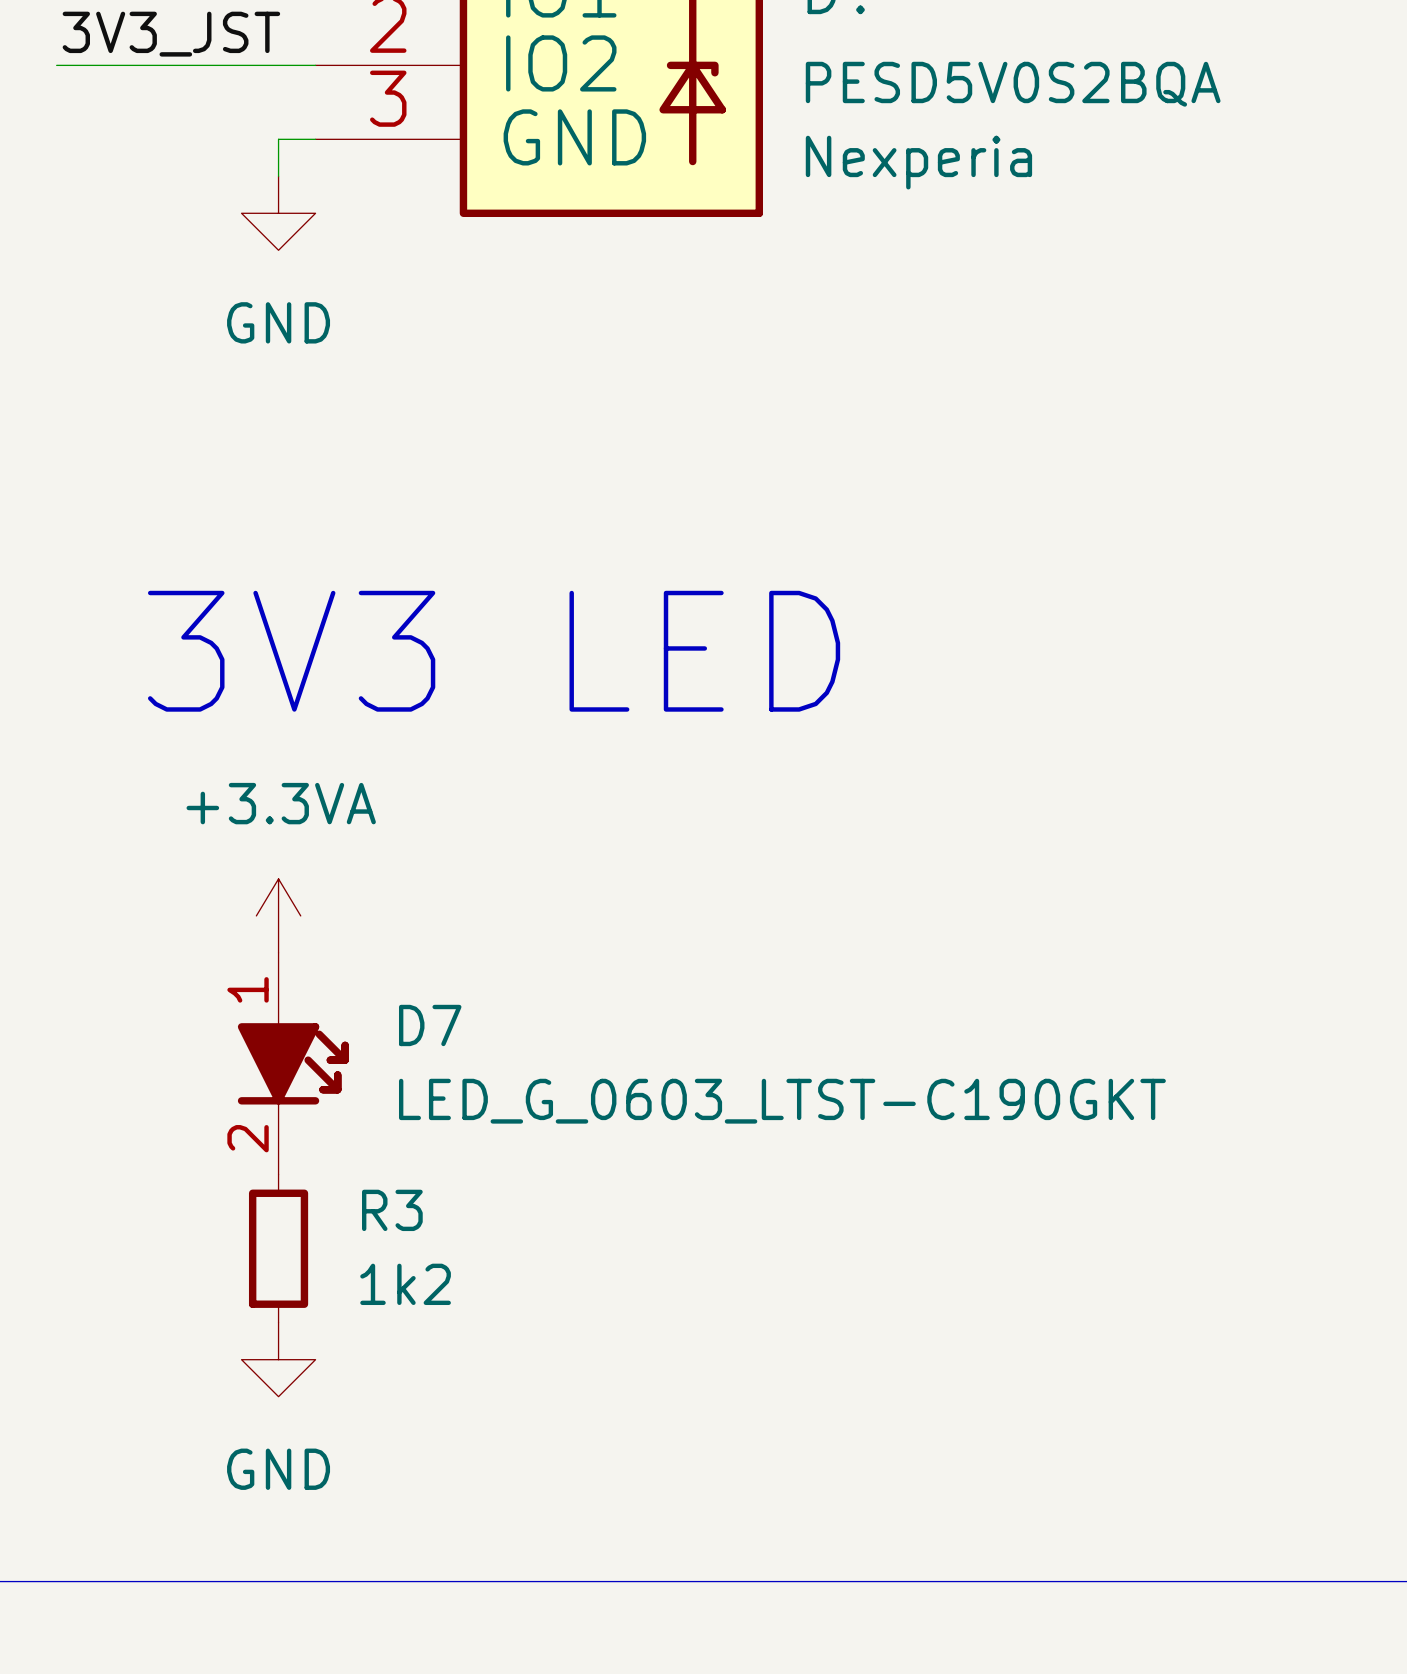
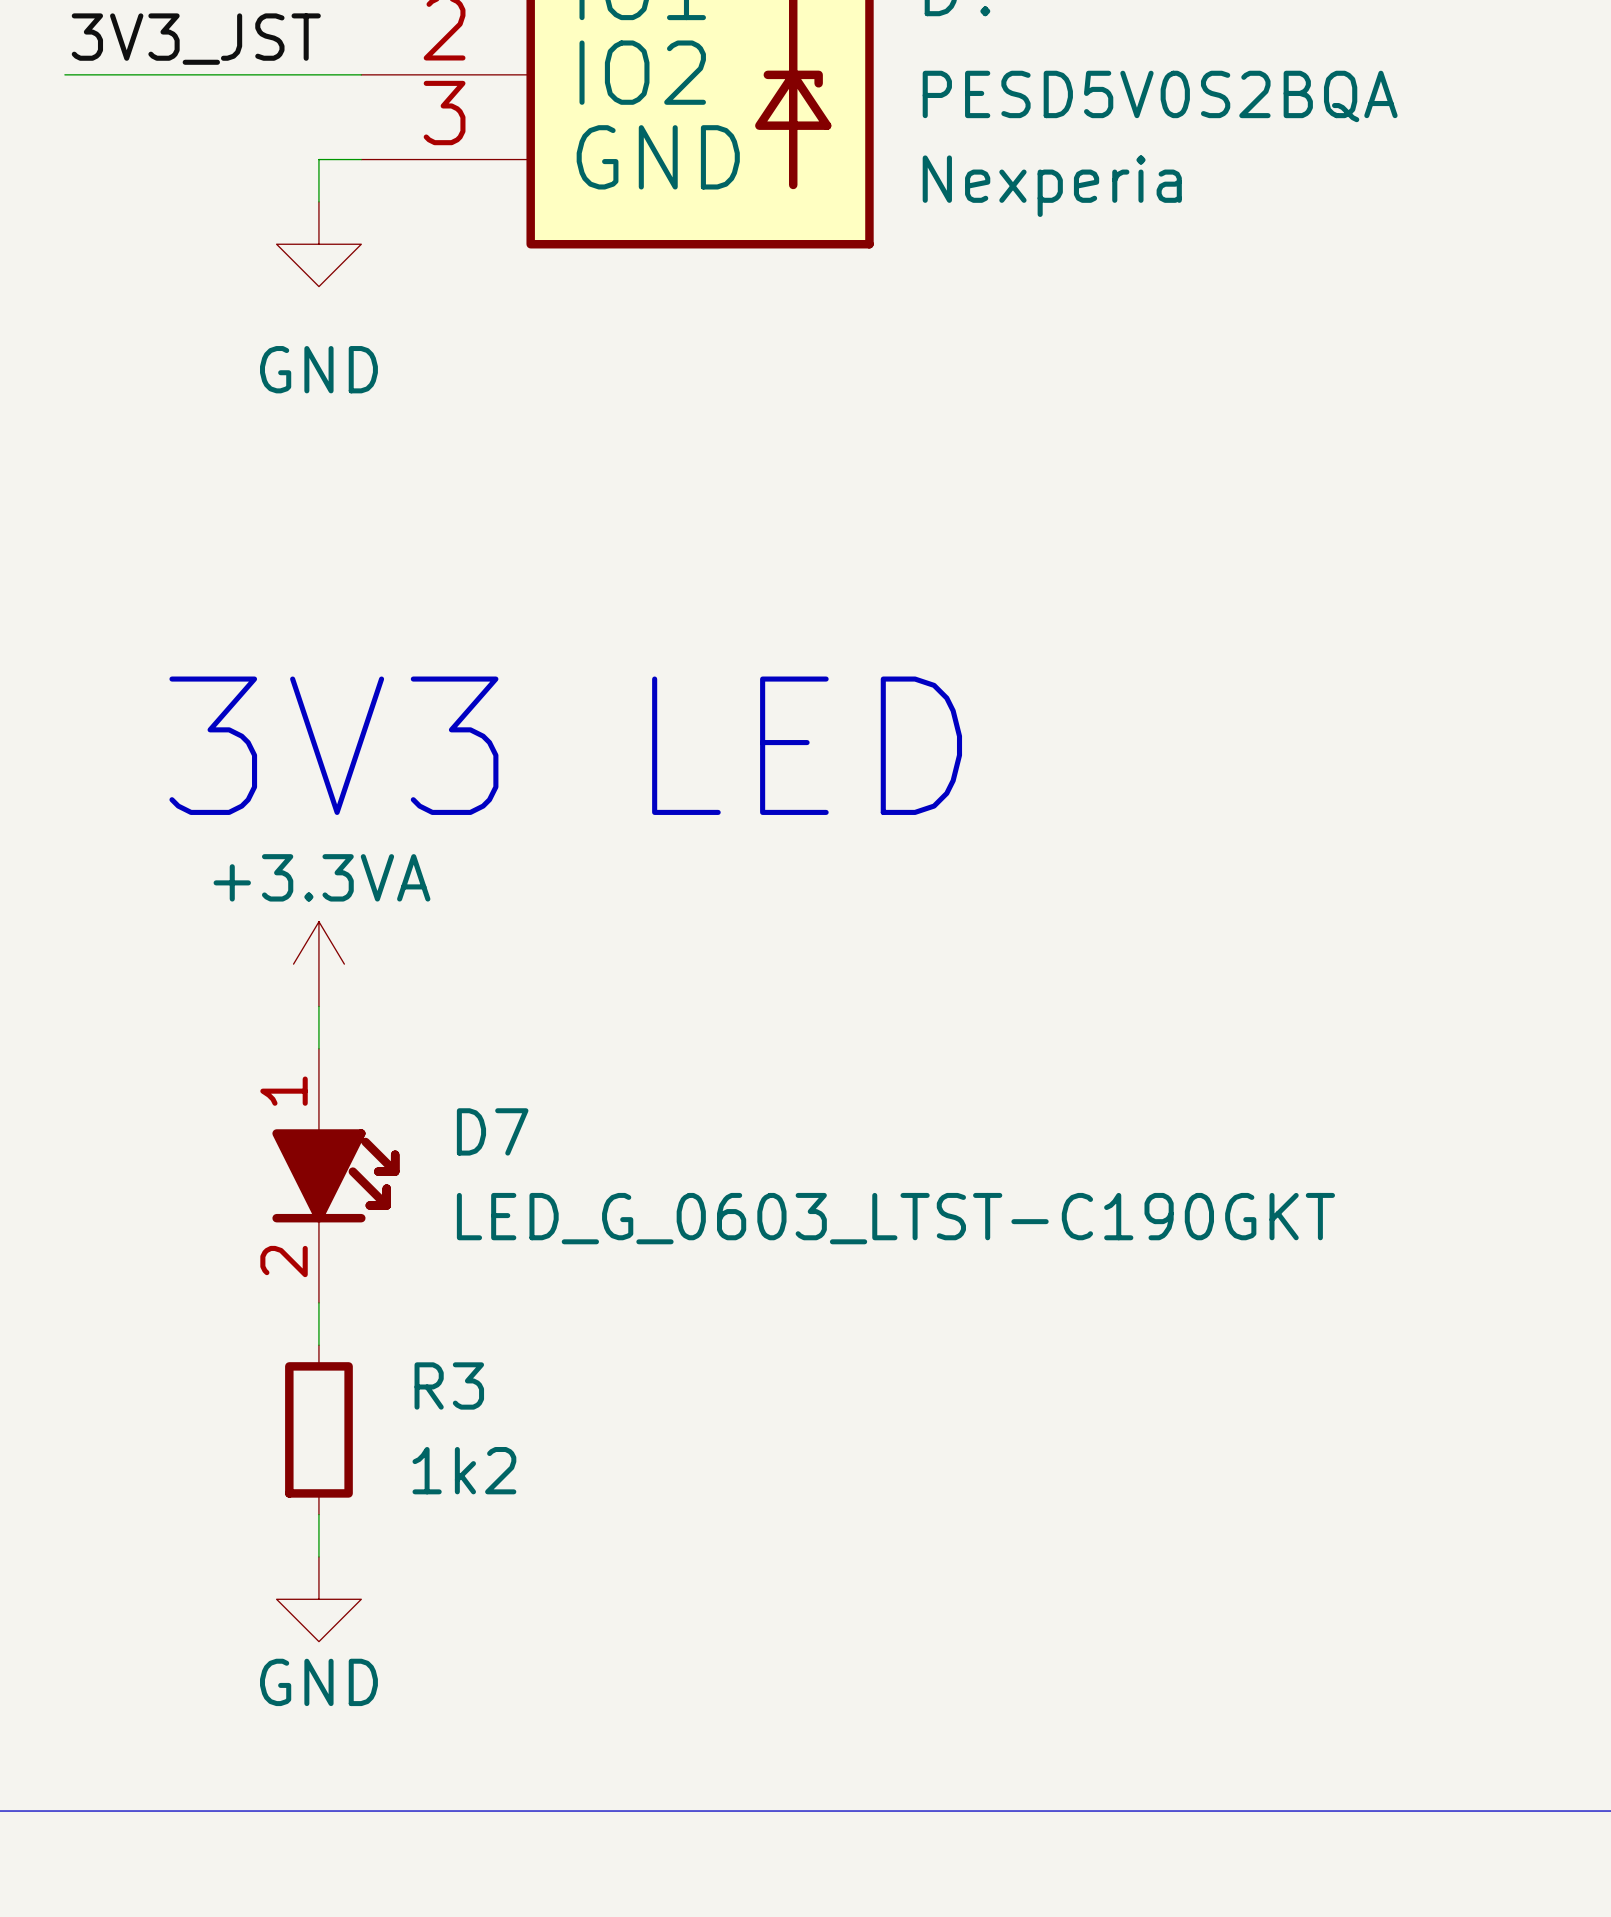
power symbol text position: +3.3VA (281, 803) -> +3.3VA (321, 877)
power symbol position: +3.3VA (278, 915) -> +3.3VA (318, 964)
D7 position: (293, 1063) -> (335, 1175)
power symbol position: GND (278, 1359) -> GND (318, 1599)

